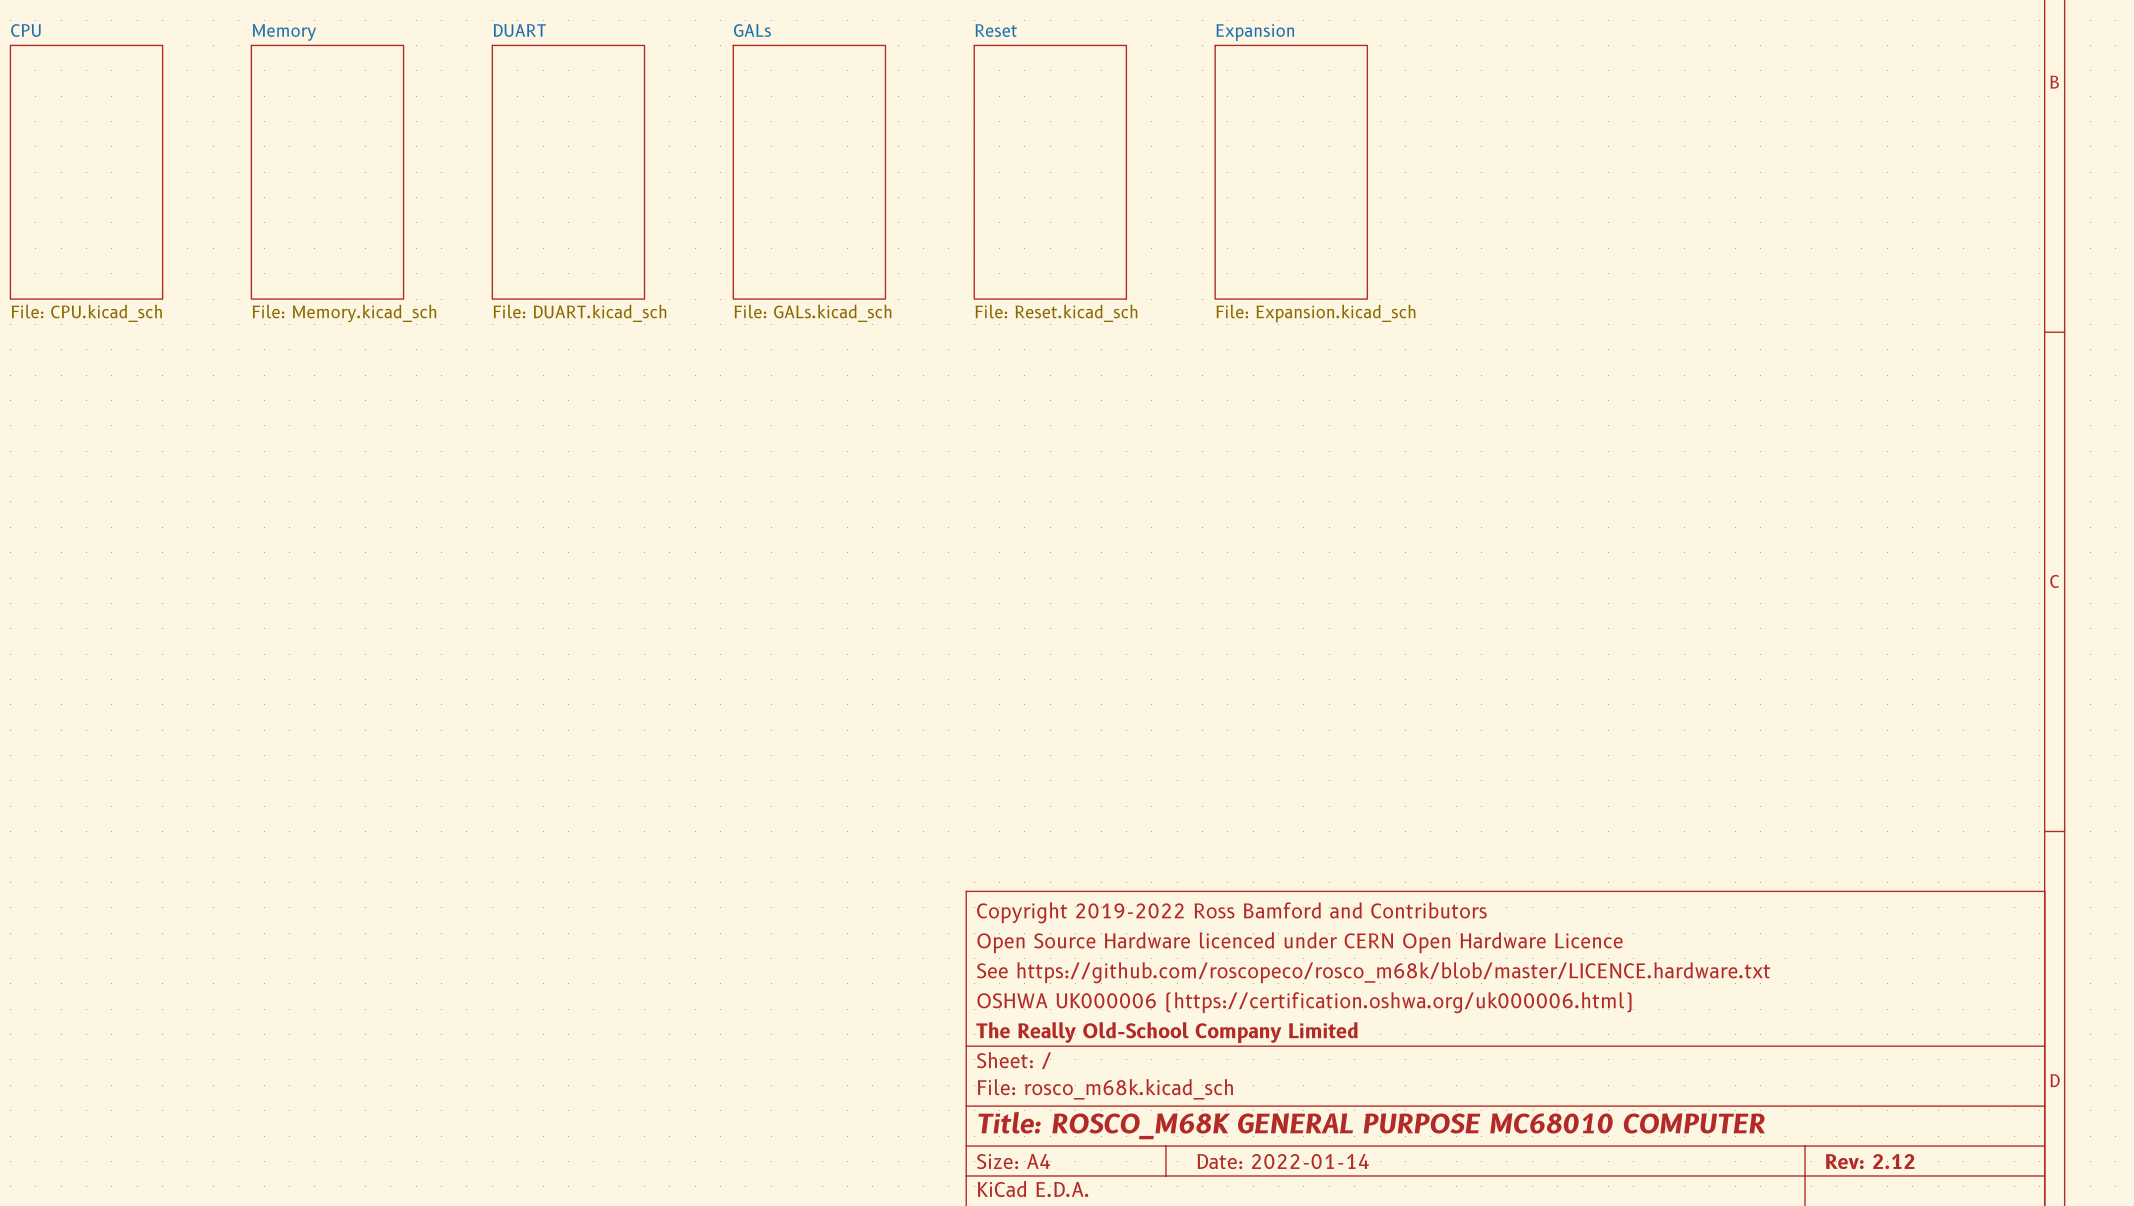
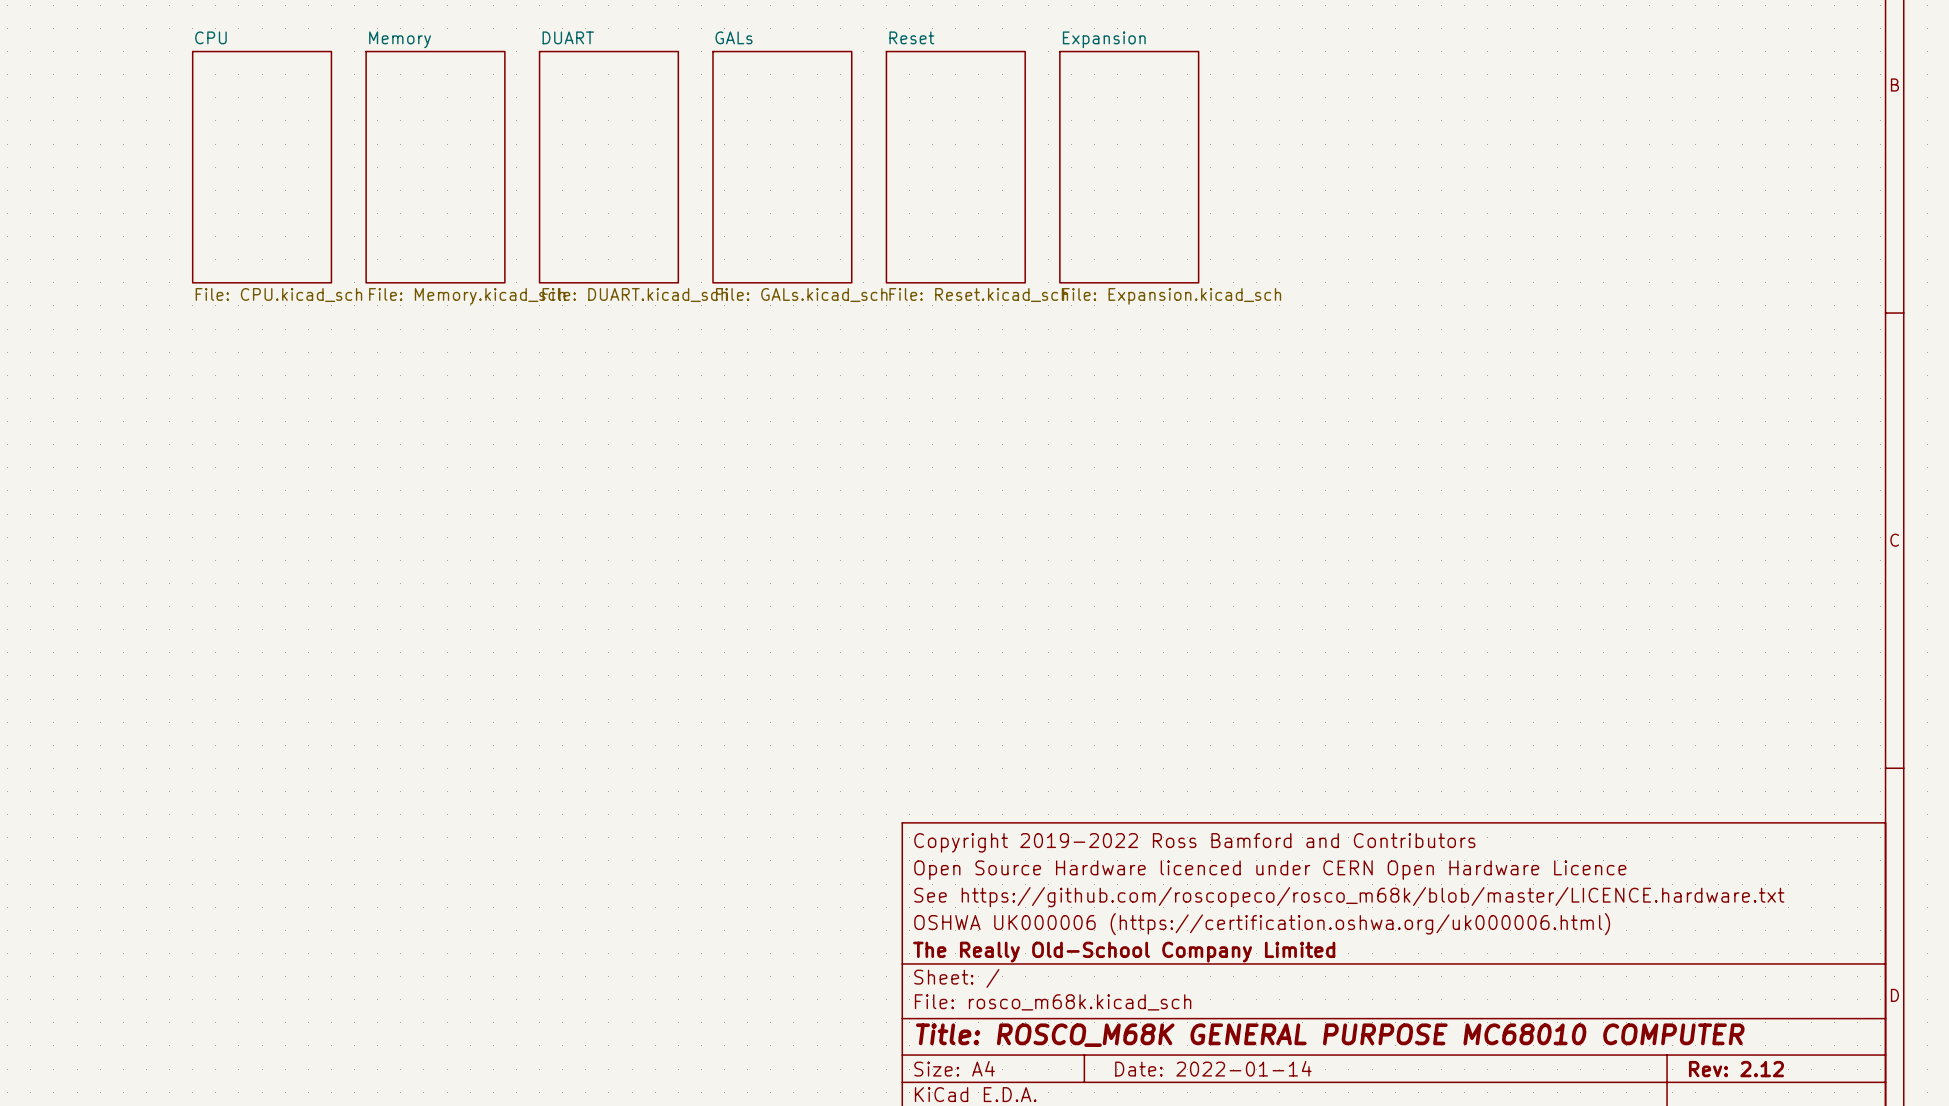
sheet CPU position: (86, 172) -> (262, 167)
sheet Memory position: (327, 172) -> (435, 167)
sheet DUART position: (568, 172) -> (608, 167)
sheet GALs position: (809, 172) -> (782, 167)
sheet Reset position: (1050, 172) -> (955, 167)
sheet Expansion position: (1291, 172) -> (1129, 167)

